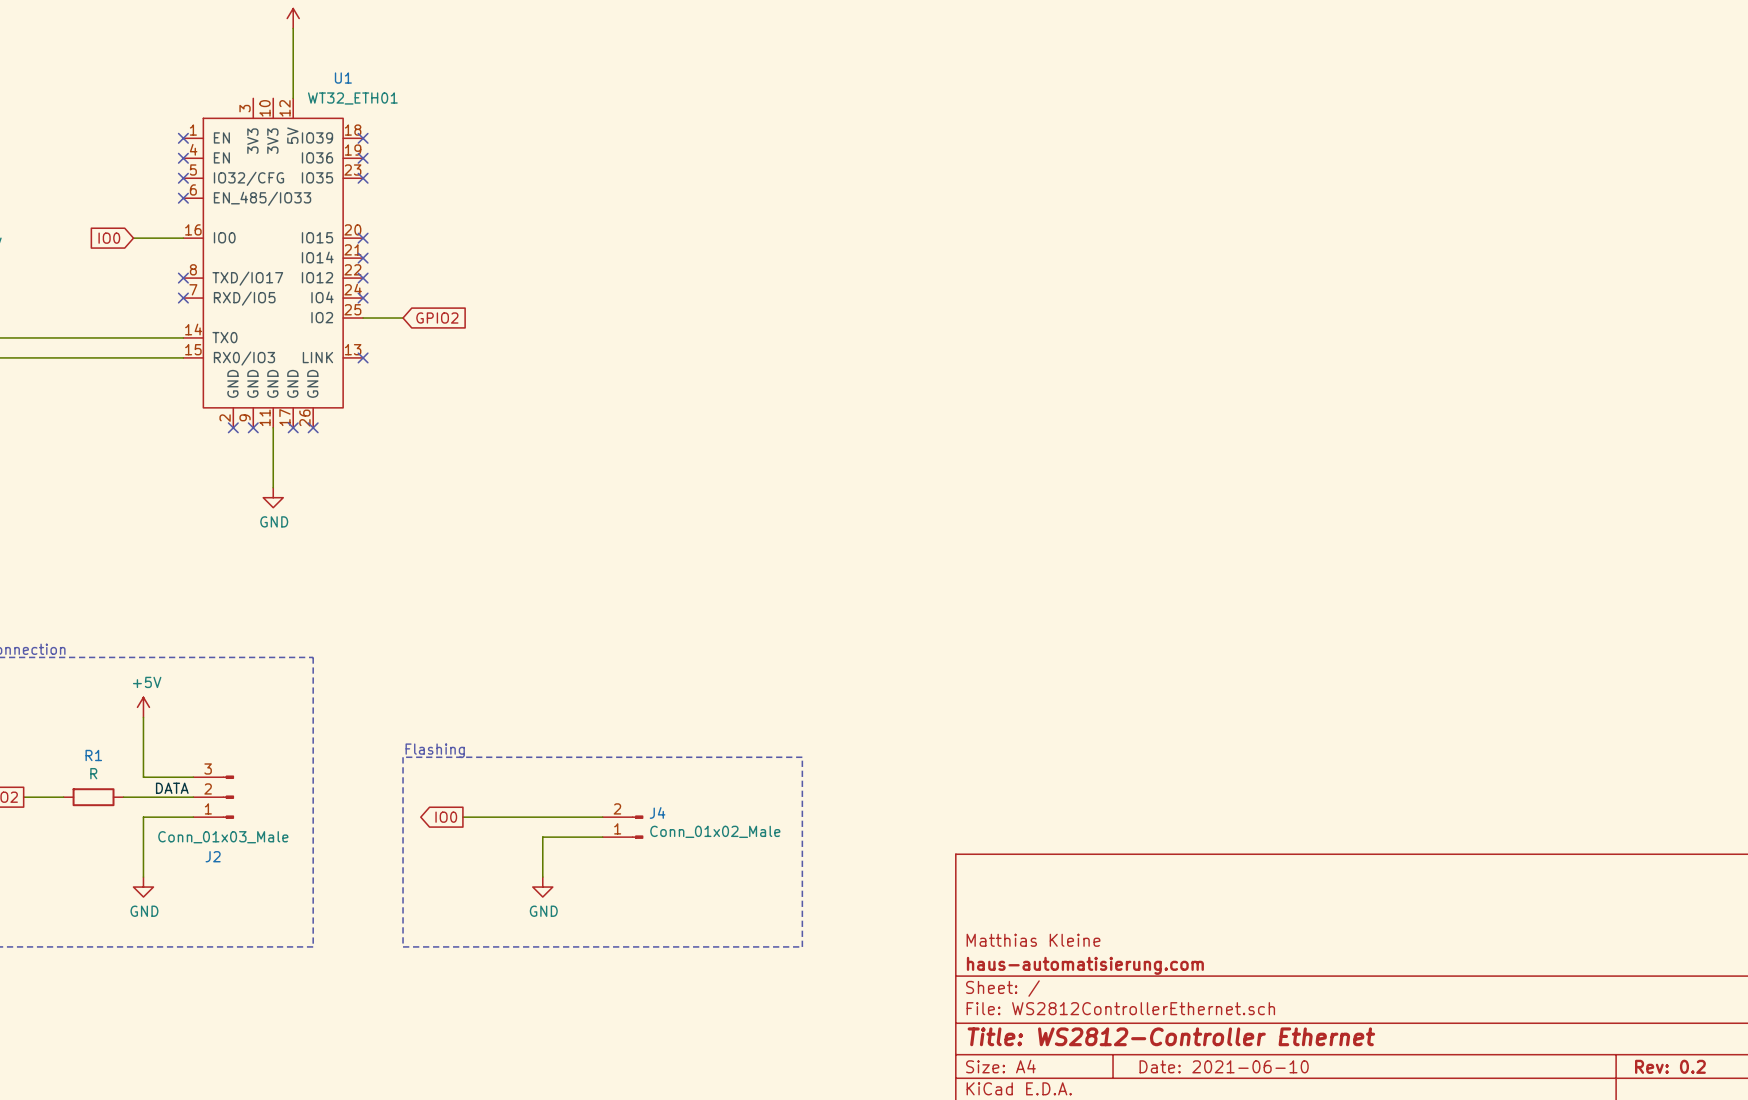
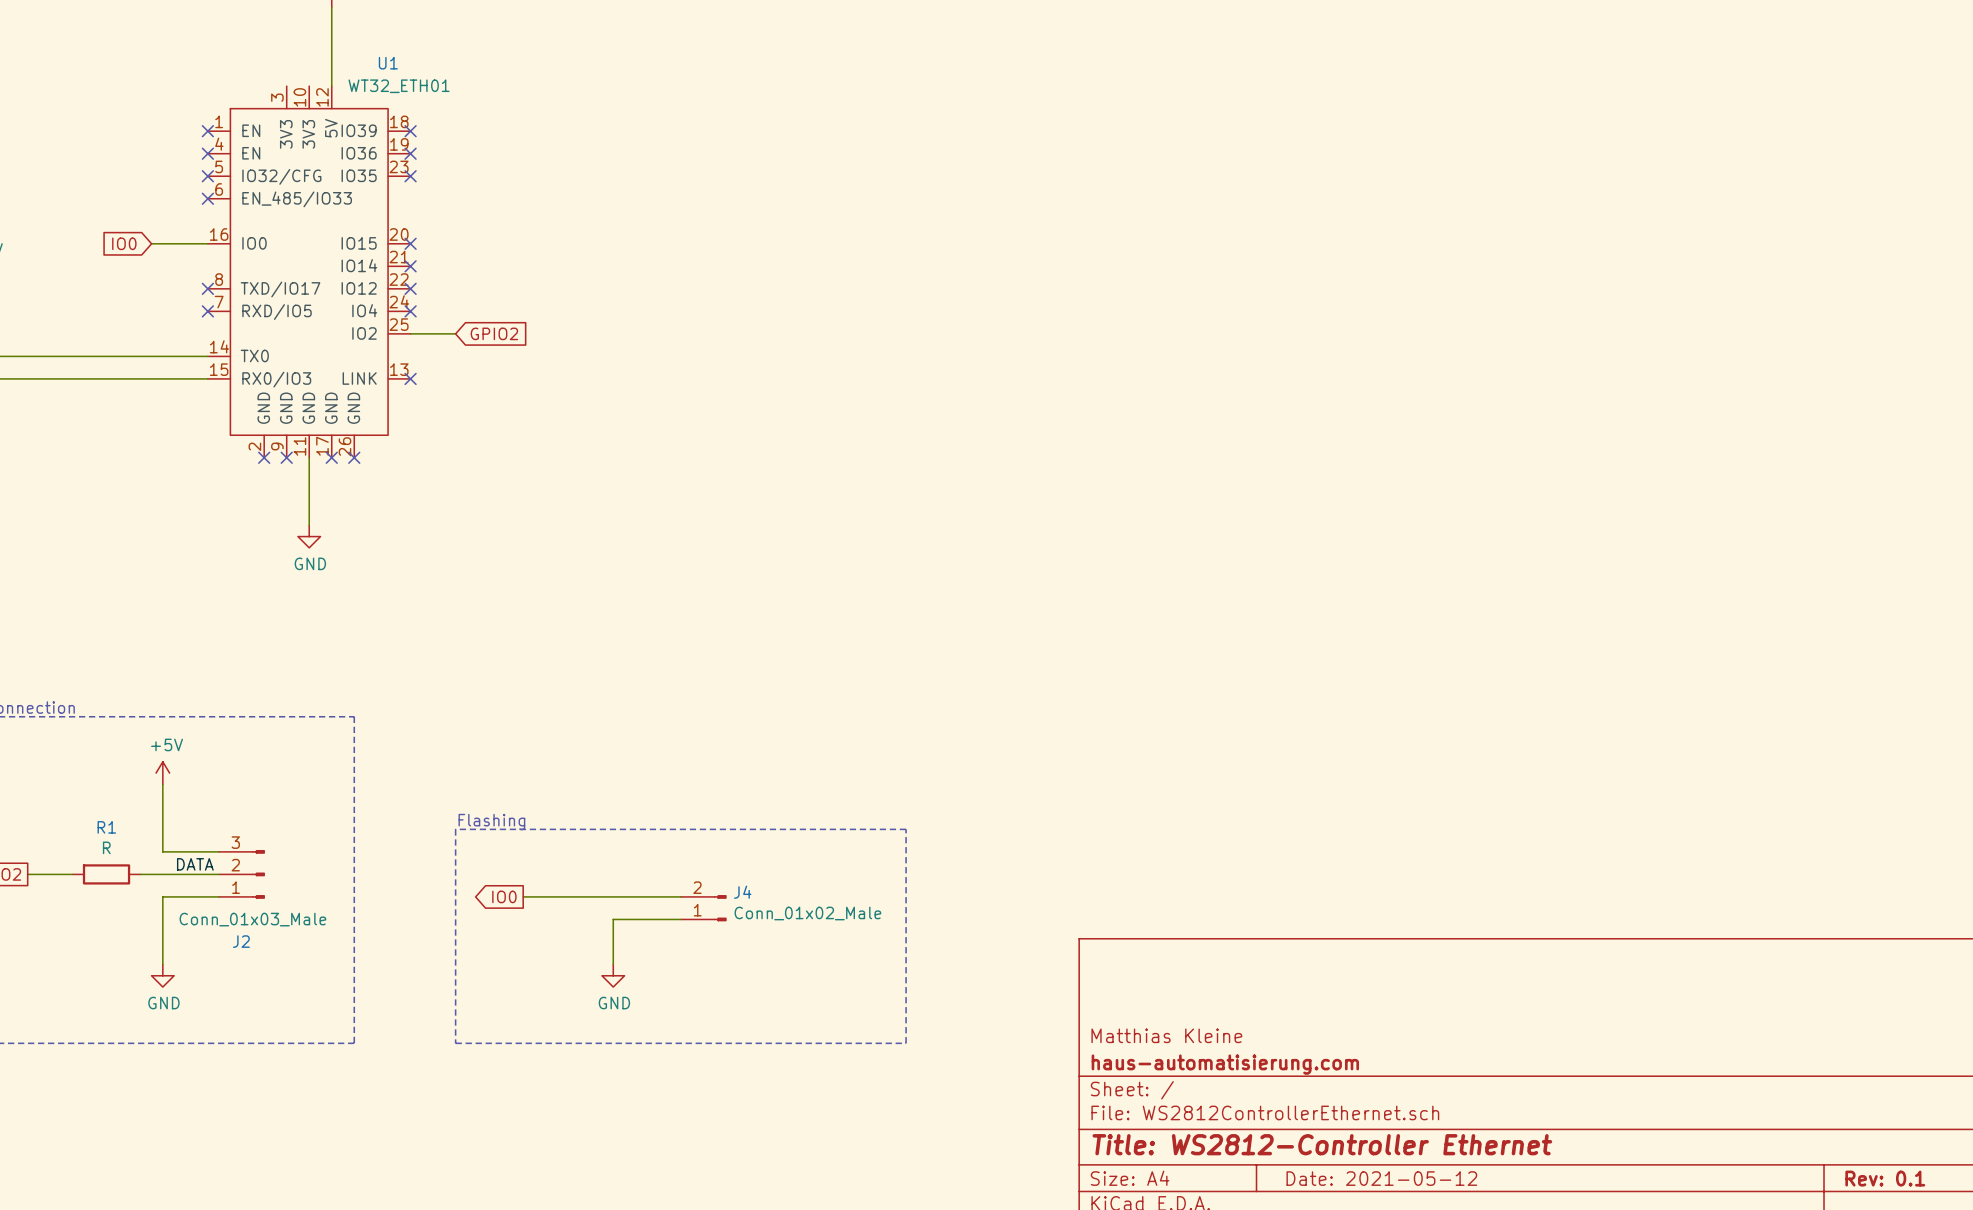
title block: Date: 2021-06-10 (1224, 1066) -> Date: 2021-05-12 (1381, 1178)
title block: Rev: 0.2 (1670, 1066) -> Rev: 0.1 (1885, 1178)

